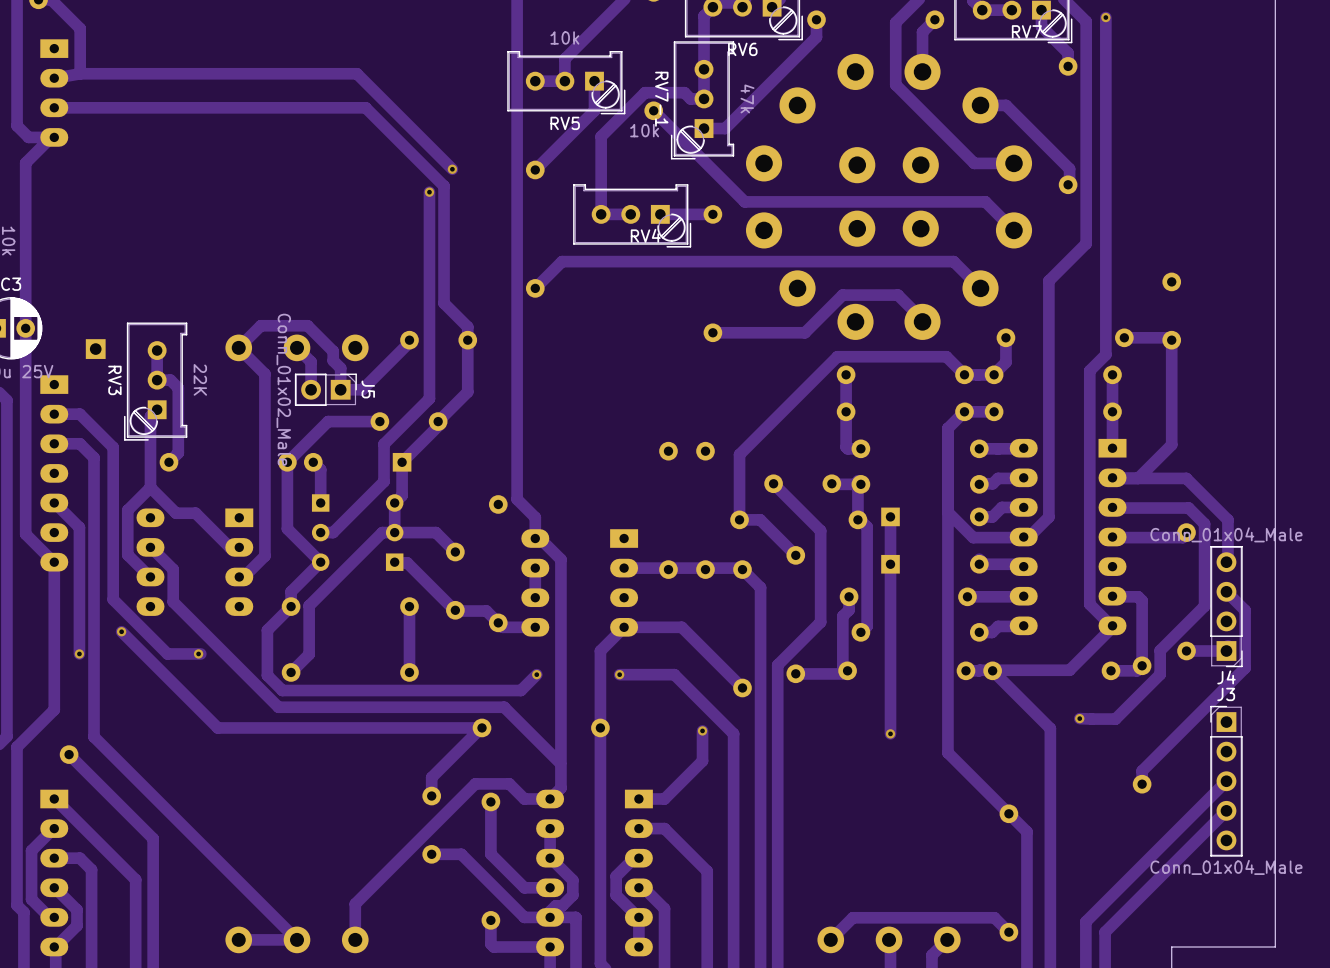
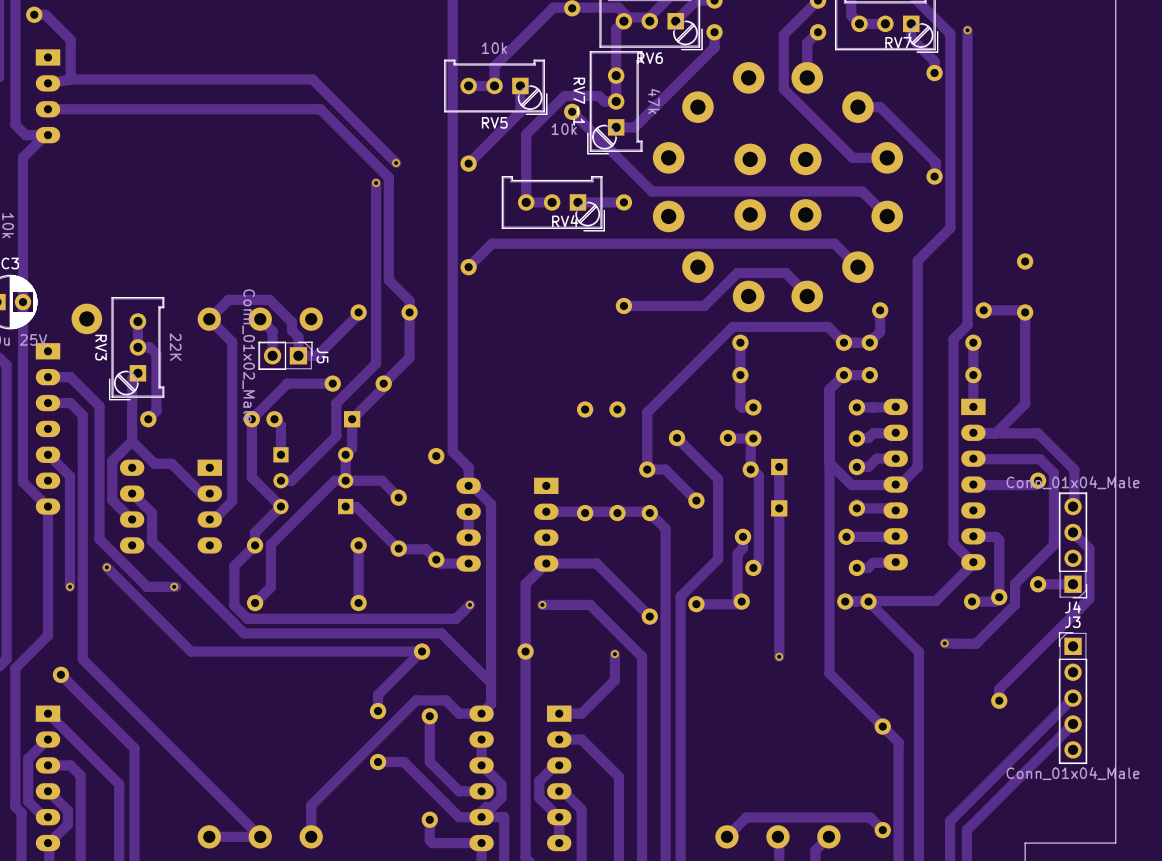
part footprint: [85, 339, 106, 359] -> [71, 303, 103, 335]

